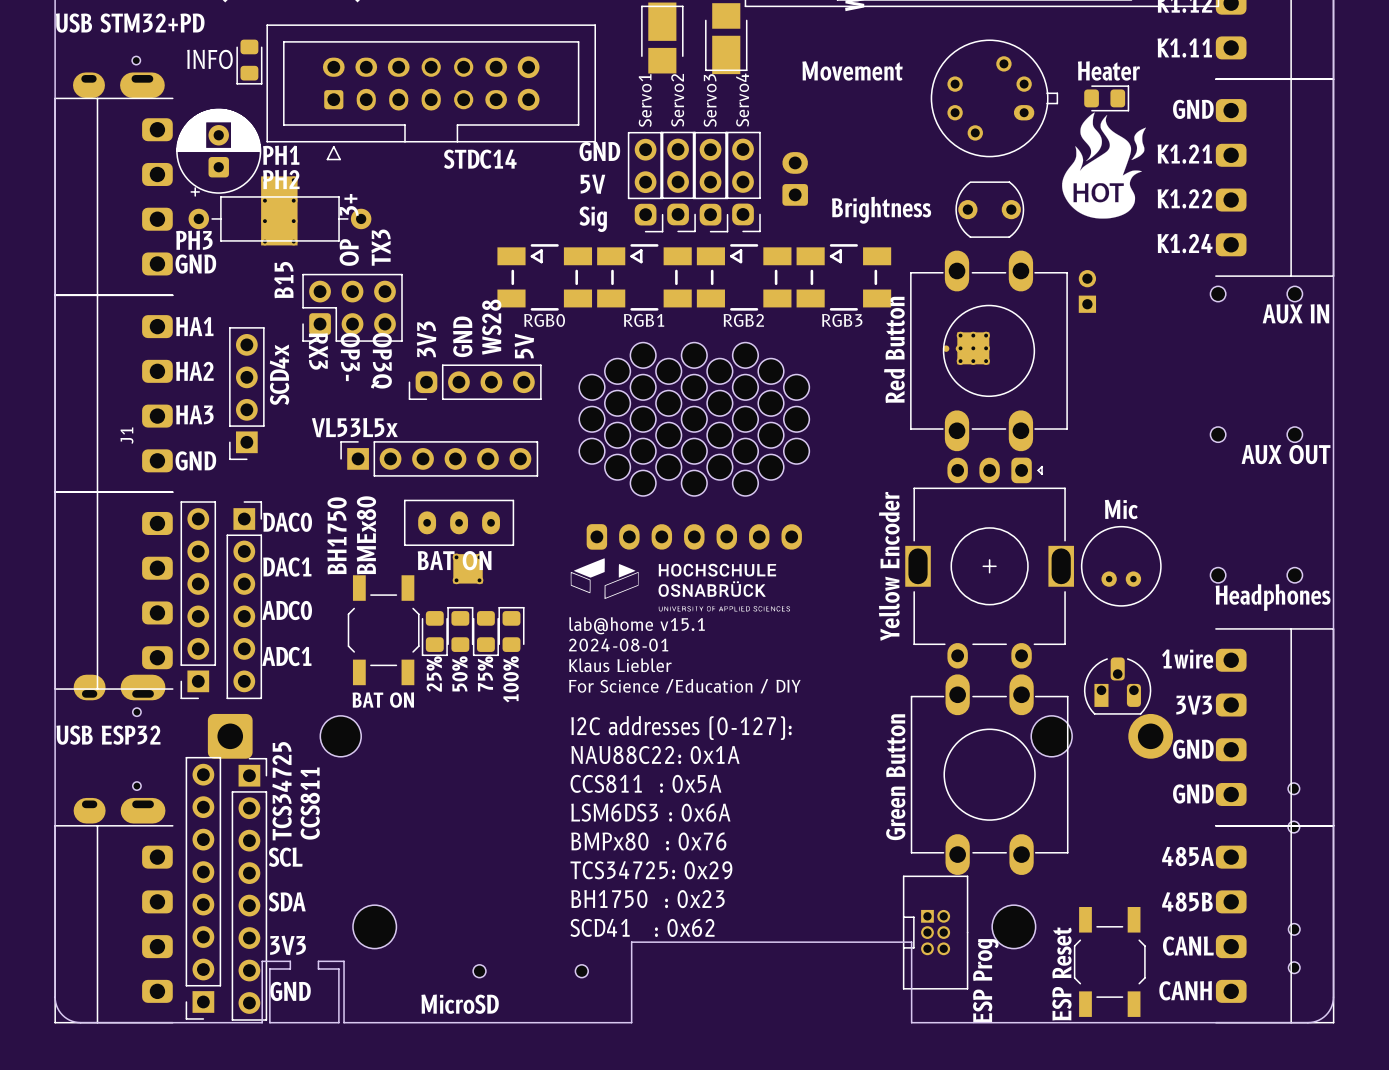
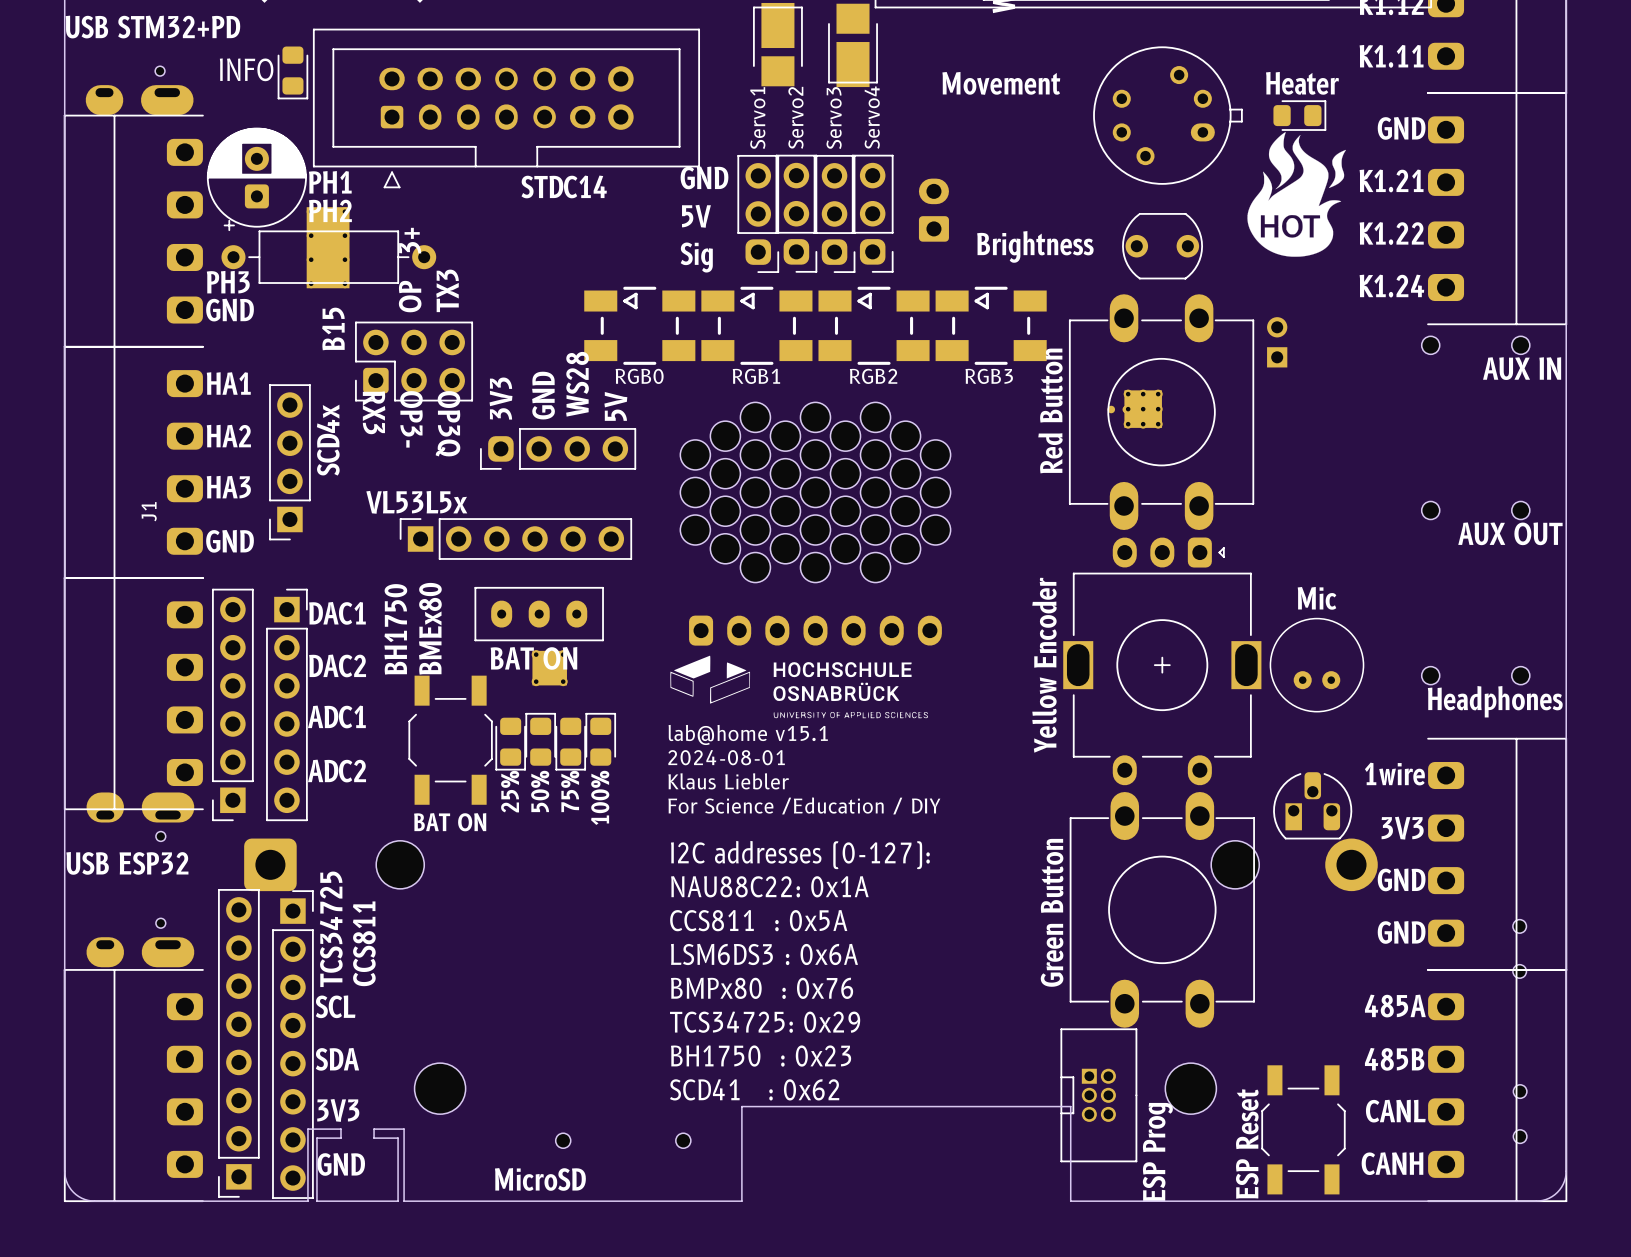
text: DAC0 (287, 522) -> DAC1 (337, 613)
text: DAC1 (287, 566) -> DAC2 (337, 665)
text: ADC0 (287, 610) -> ADC1 (336, 716)
text: ADC1 (286, 656) -> ADC2 (337, 771)

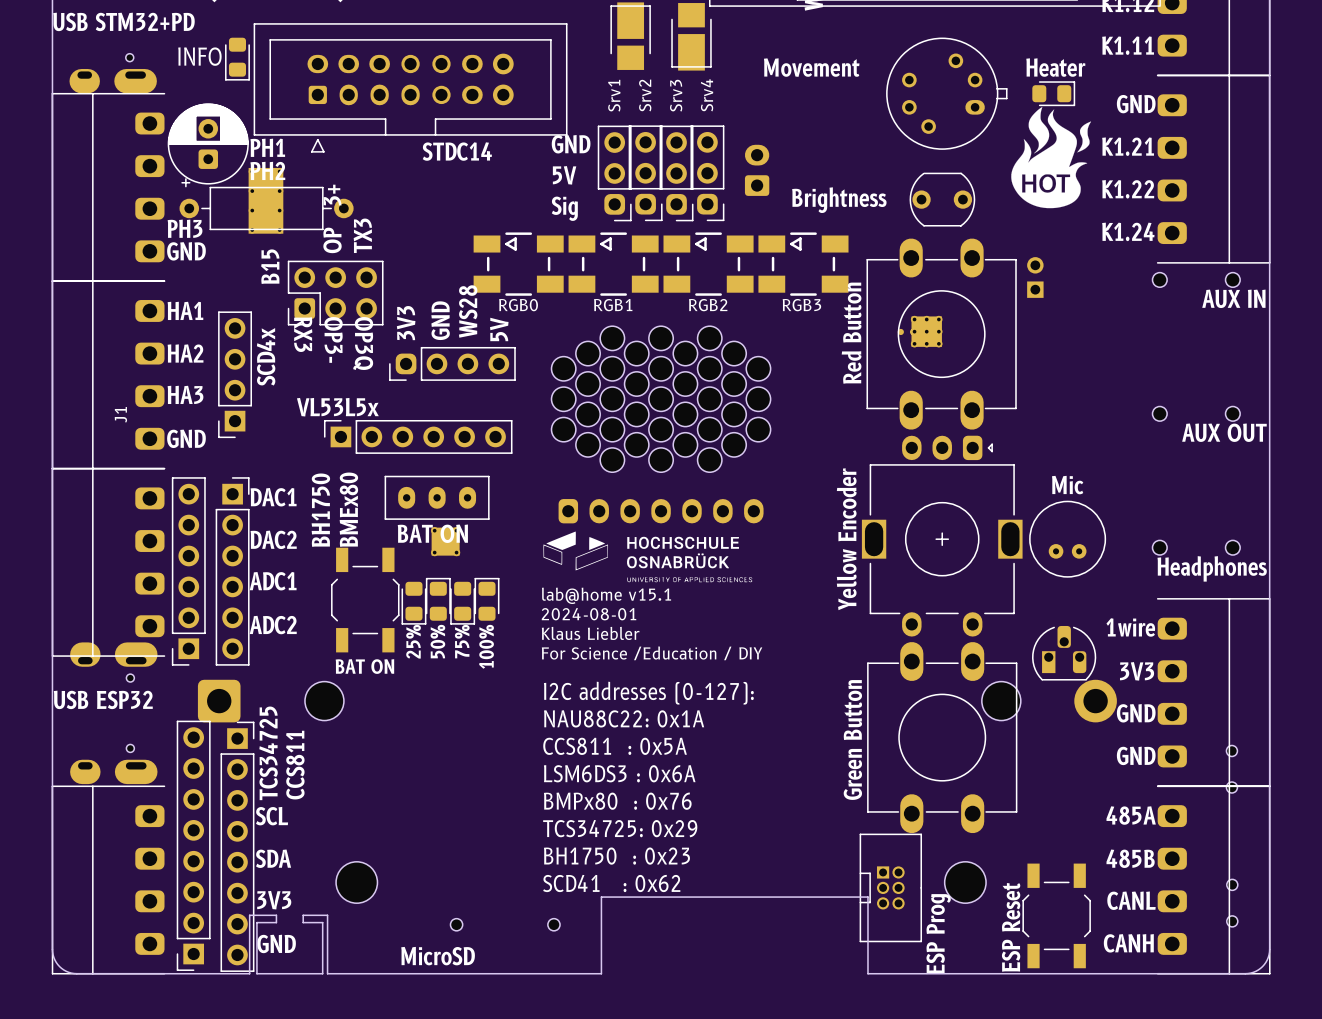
part value: Servo2 (795, 117) -> Srv2 (645, 95)
part value: Servo4 (872, 117) -> Srv4 (707, 95)
part value: Servo1 (757, 118) -> Srv1 (614, 95)
part value: Servo3 (834, 118) -> Srv3 (676, 95)

